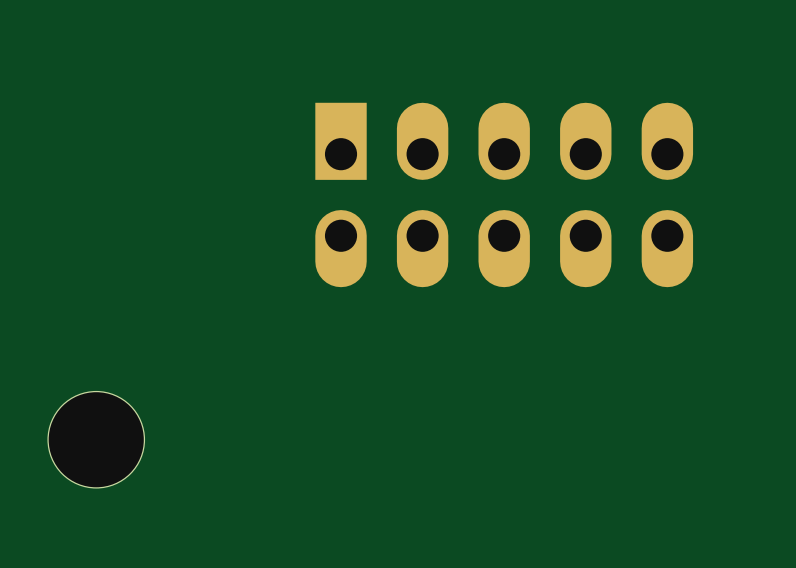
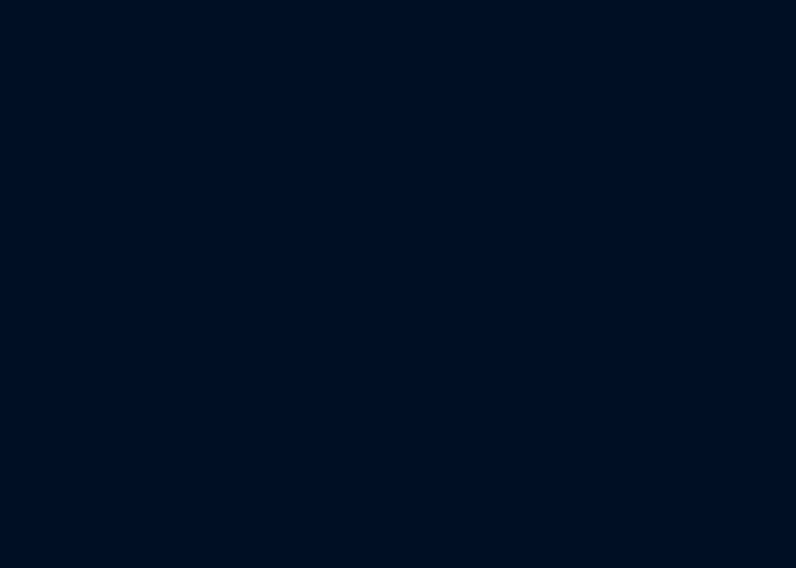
part: (504, 194) -> none
part: (96, 439) -> none

